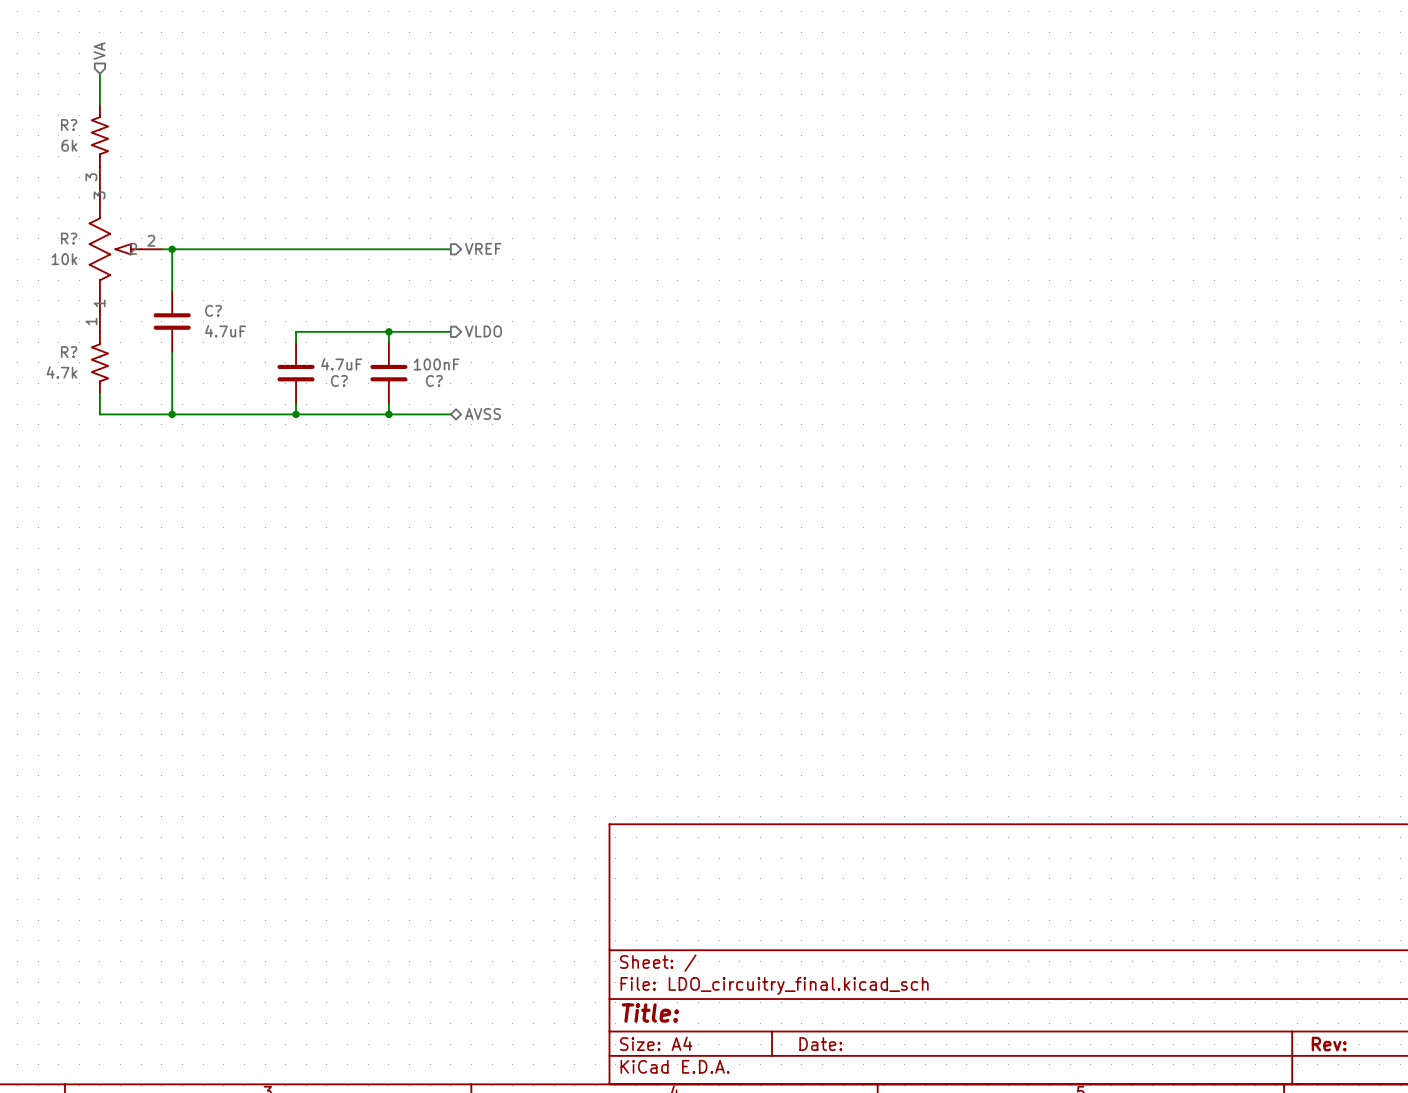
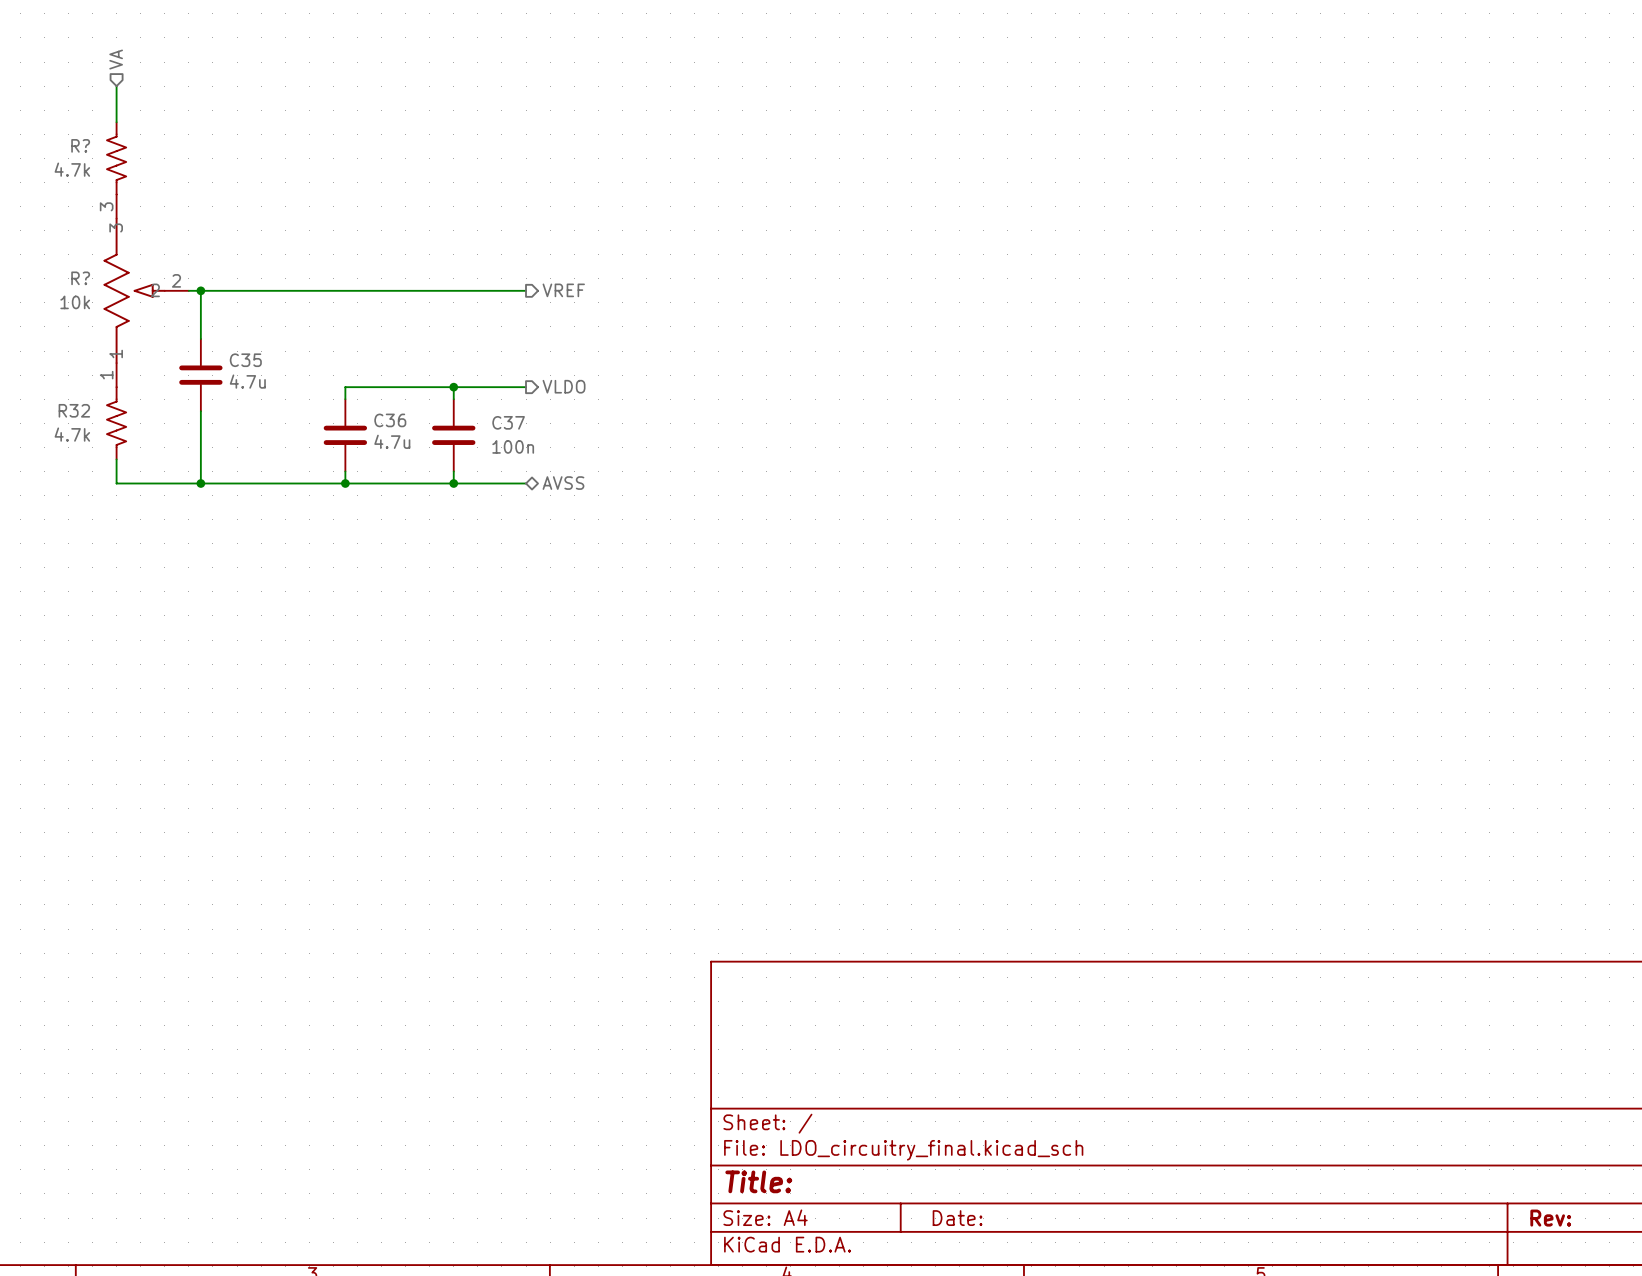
R? value: 6k (69, 145) -> 4.7k (72, 169)
C? name: C? (213, 310) -> C35 (245, 360)
C? value: 4.7uF (225, 331) -> 4.7u (247, 381)
R? name: R? (69, 352) -> R32 (74, 410)
C? value: 4.7uF (341, 364) -> 4.7u (392, 441)
C? value: 100nF (436, 364) -> 100n (513, 446)
C? name: C? (339, 381) -> C36 (390, 420)
C? name: C? (434, 381) -> C37 (508, 422)

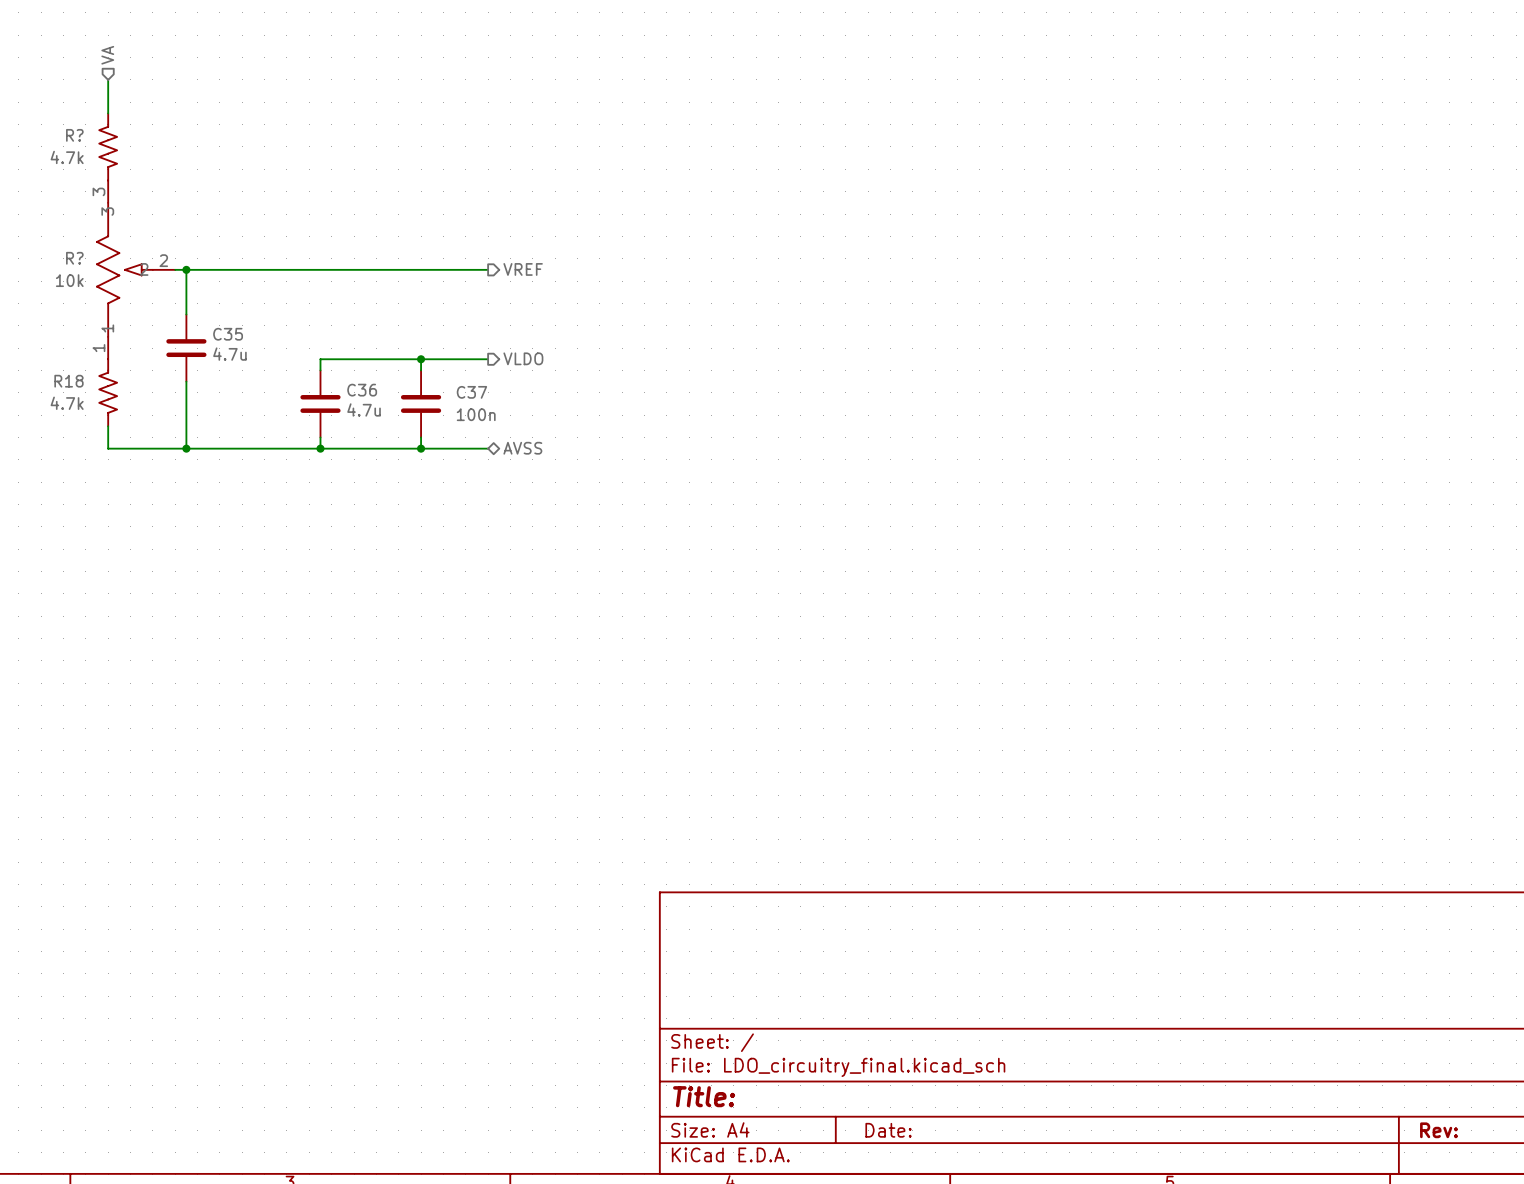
R32 name: R32 (74, 410) -> R18 (68, 381)

